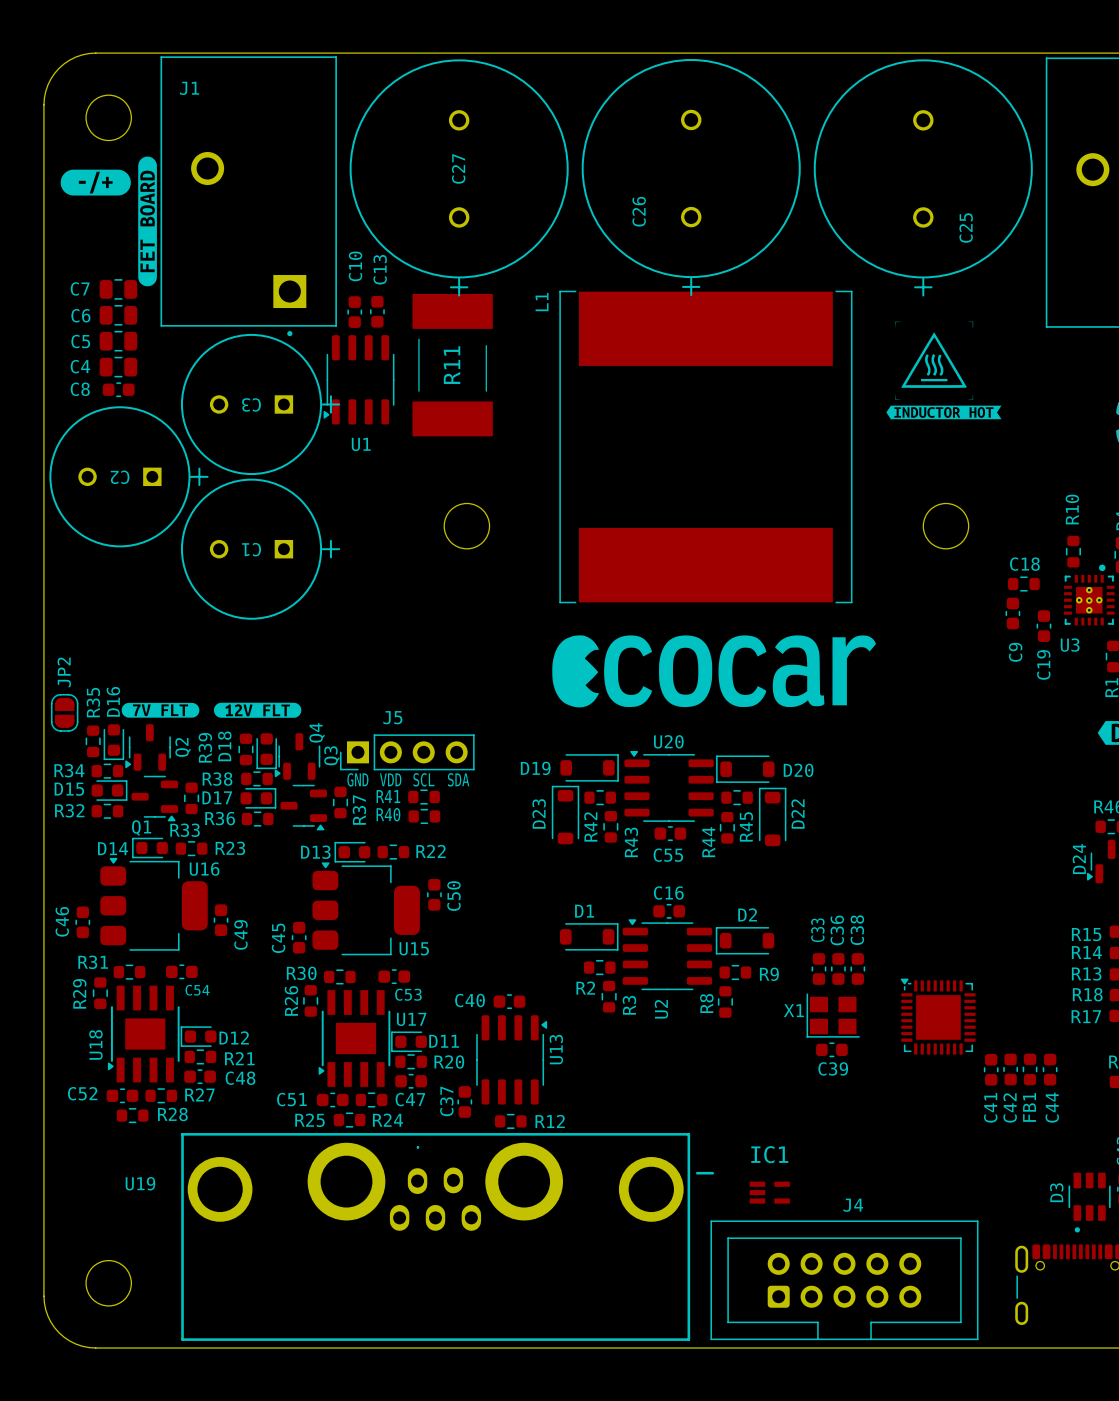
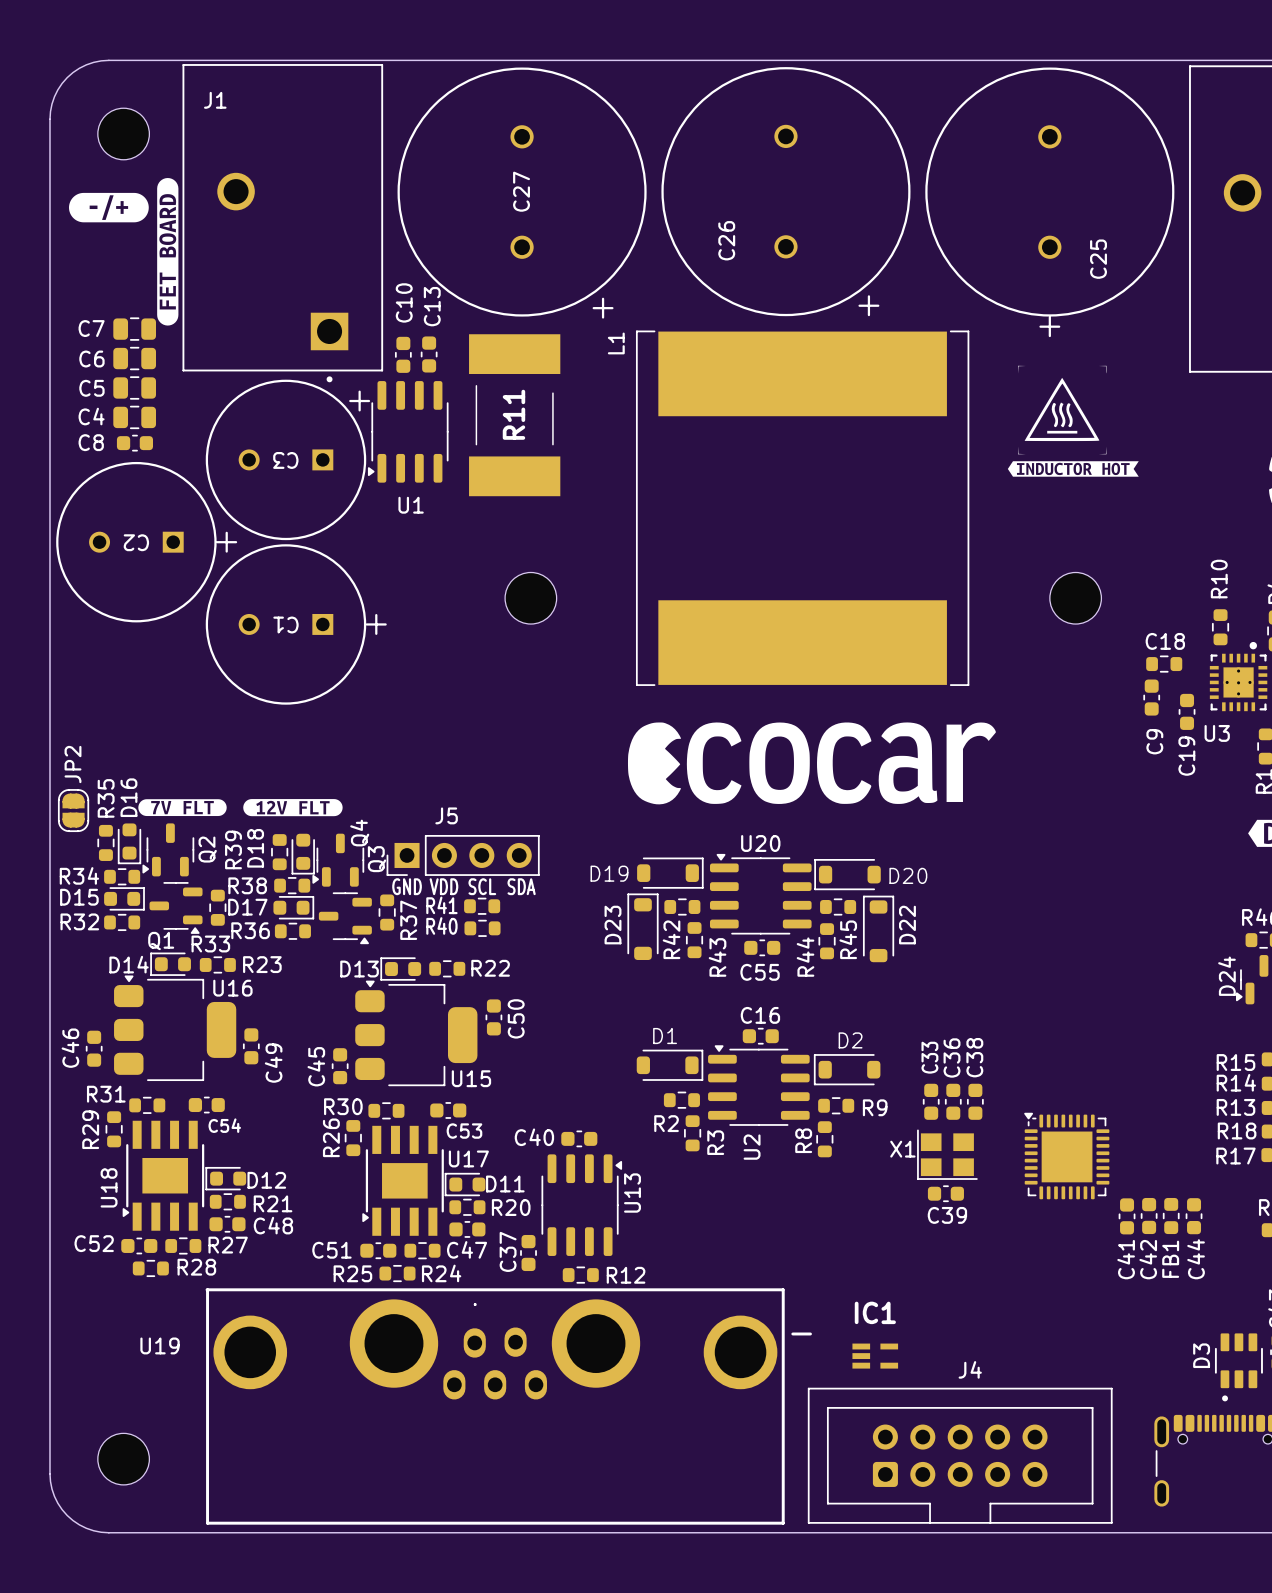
C27 footprint: [349, 59, 569, 297] -> [397, 67, 647, 319]
C26 footprint: [581, 59, 801, 297] -> [661, 67, 911, 317]
C3 footprint: [180, 333, 341, 476] -> [205, 379, 371, 541]

